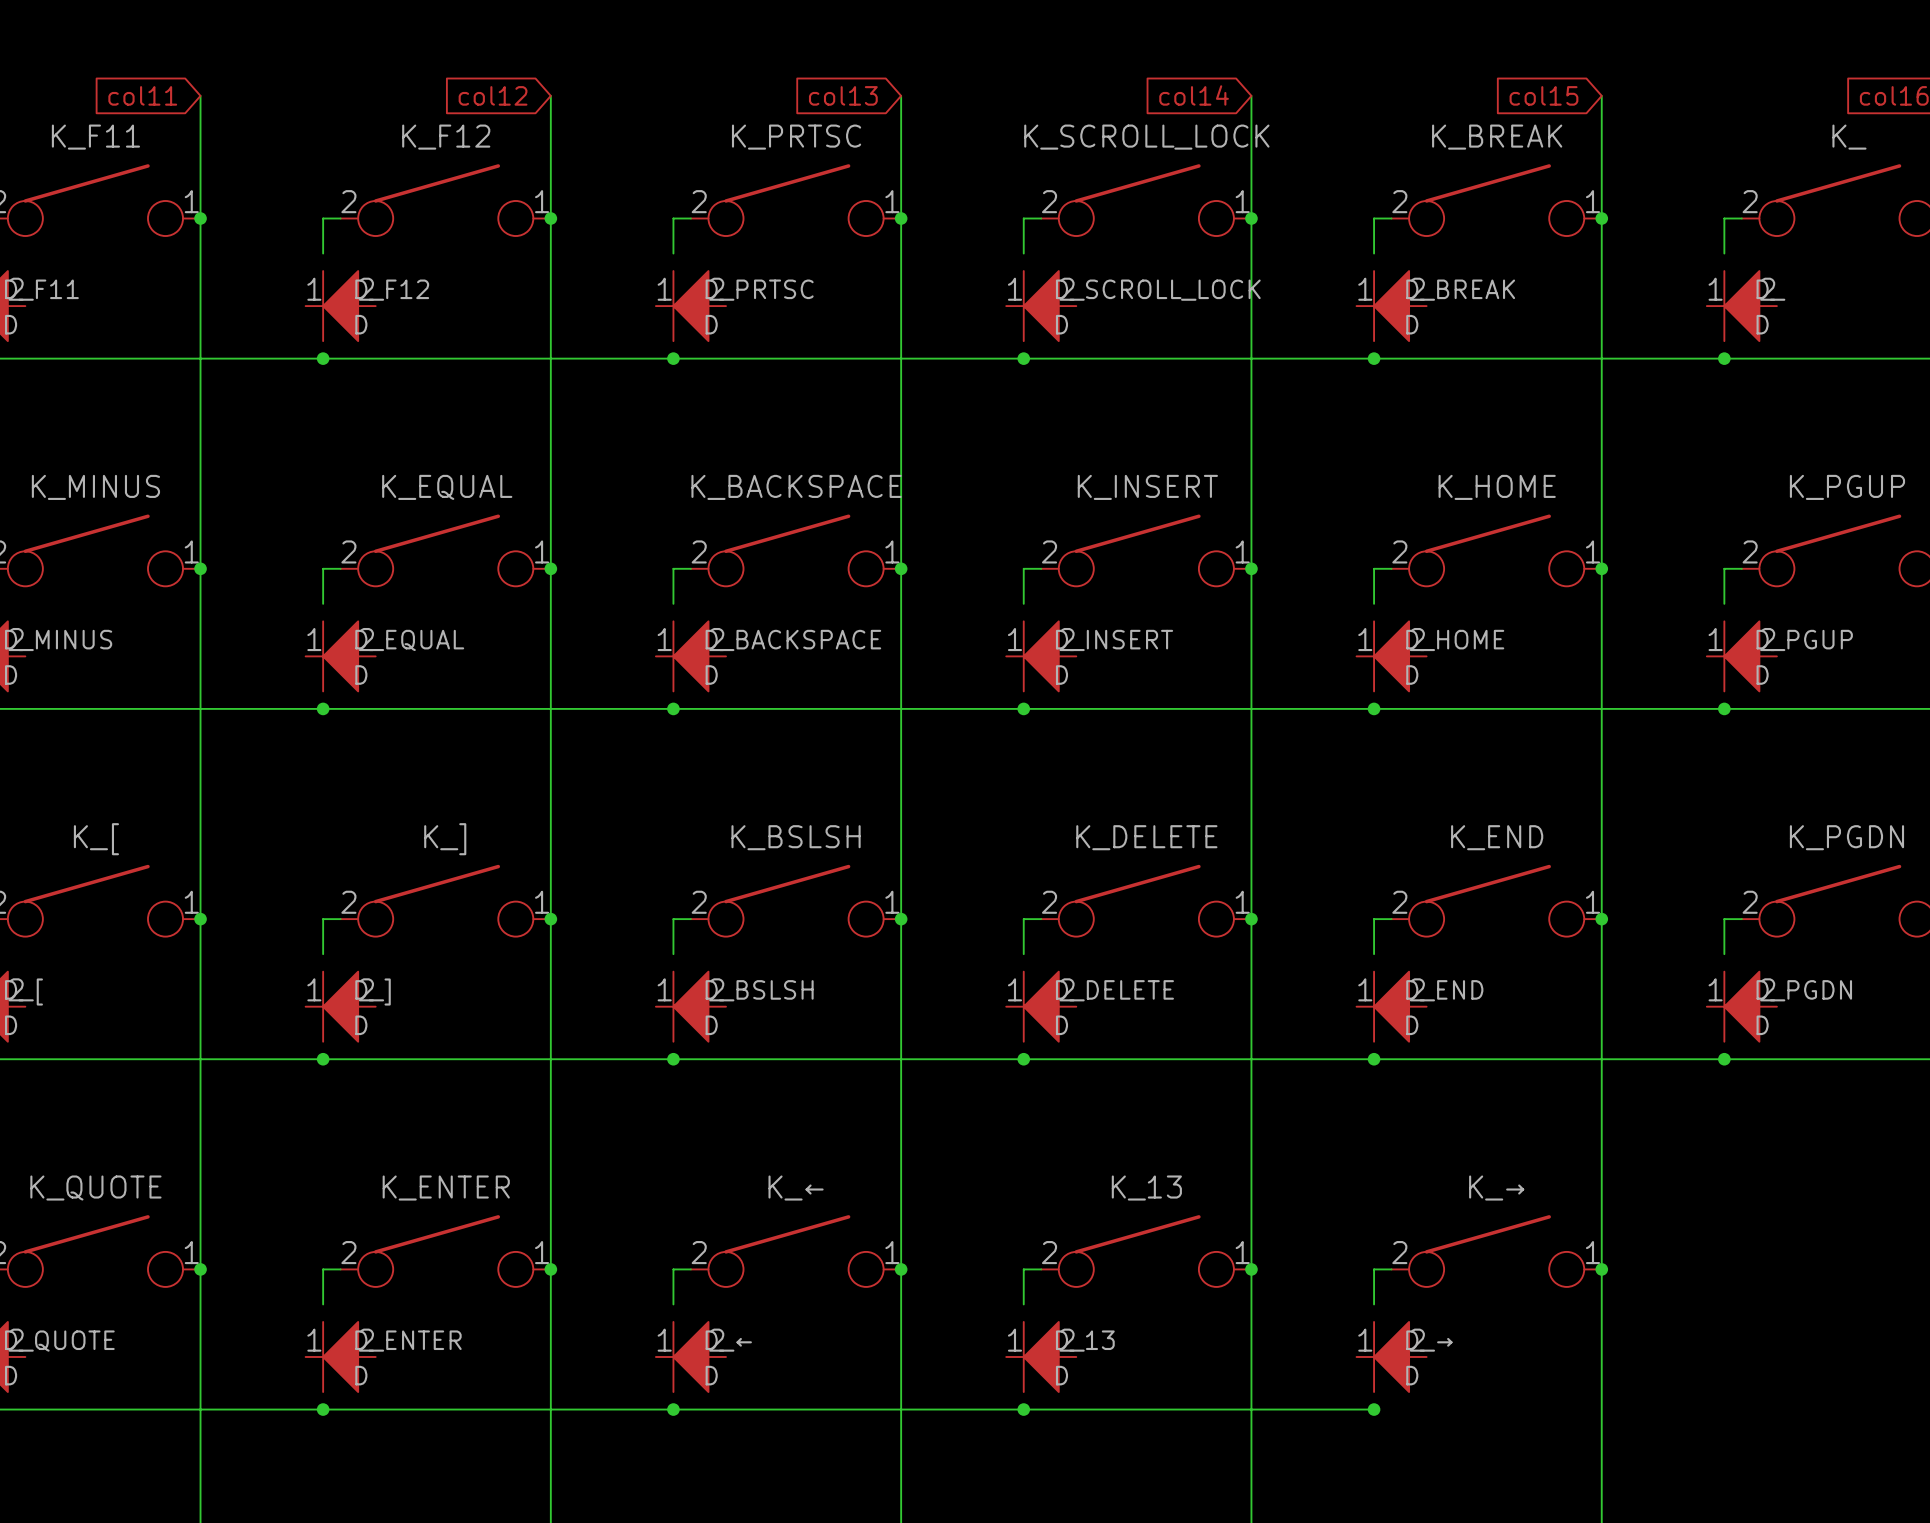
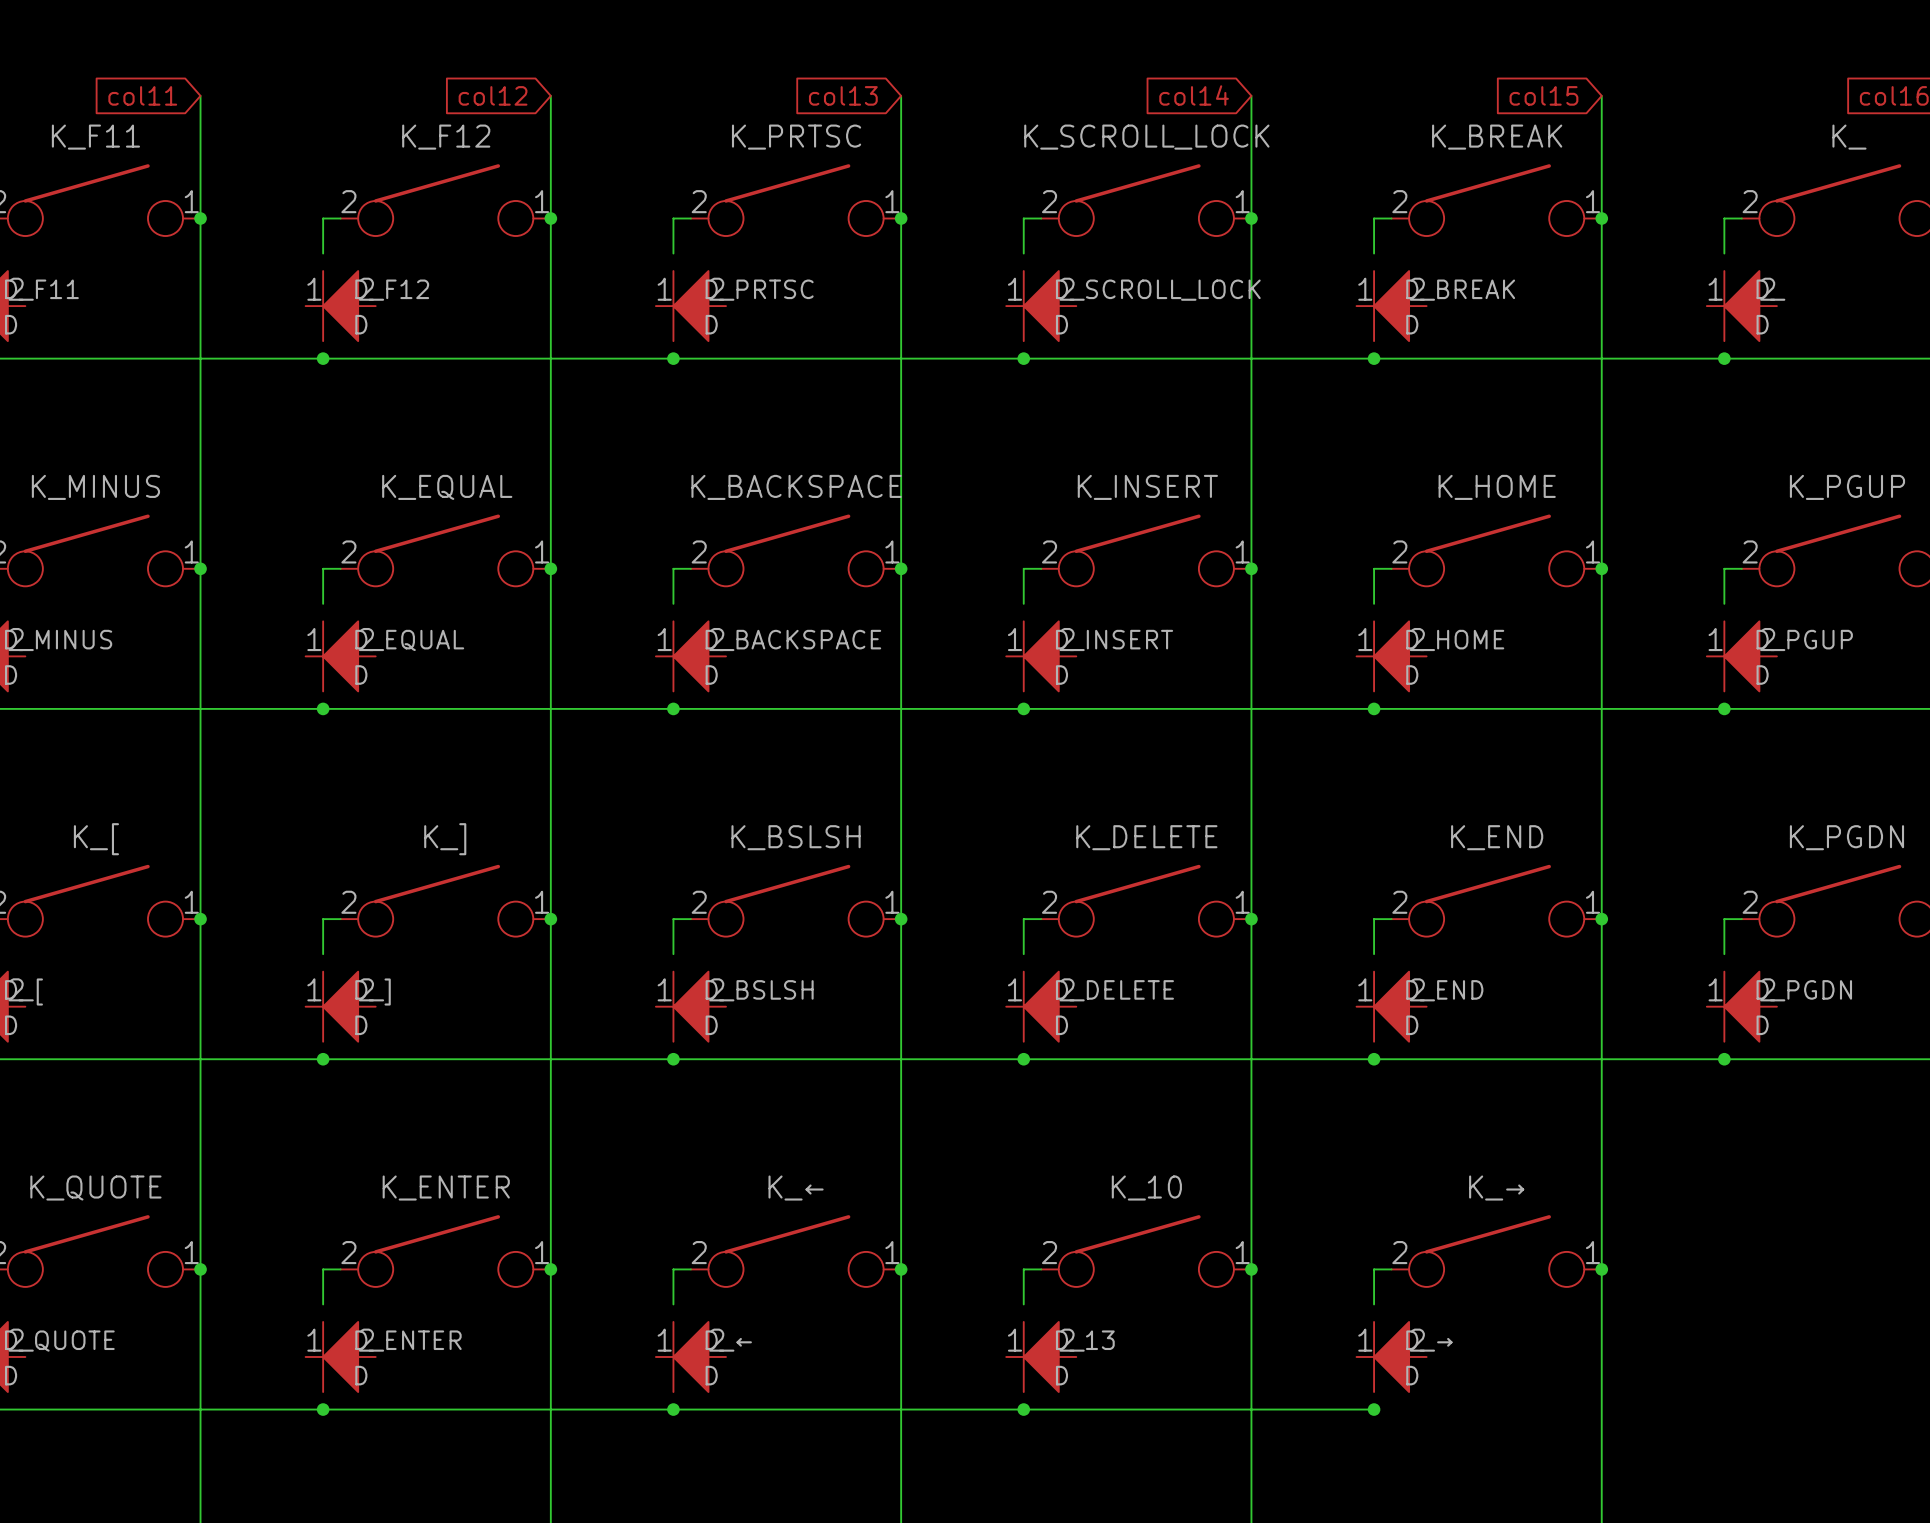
K_13 name: K_13 (1146, 1188) -> K_10 (1146, 1188)

